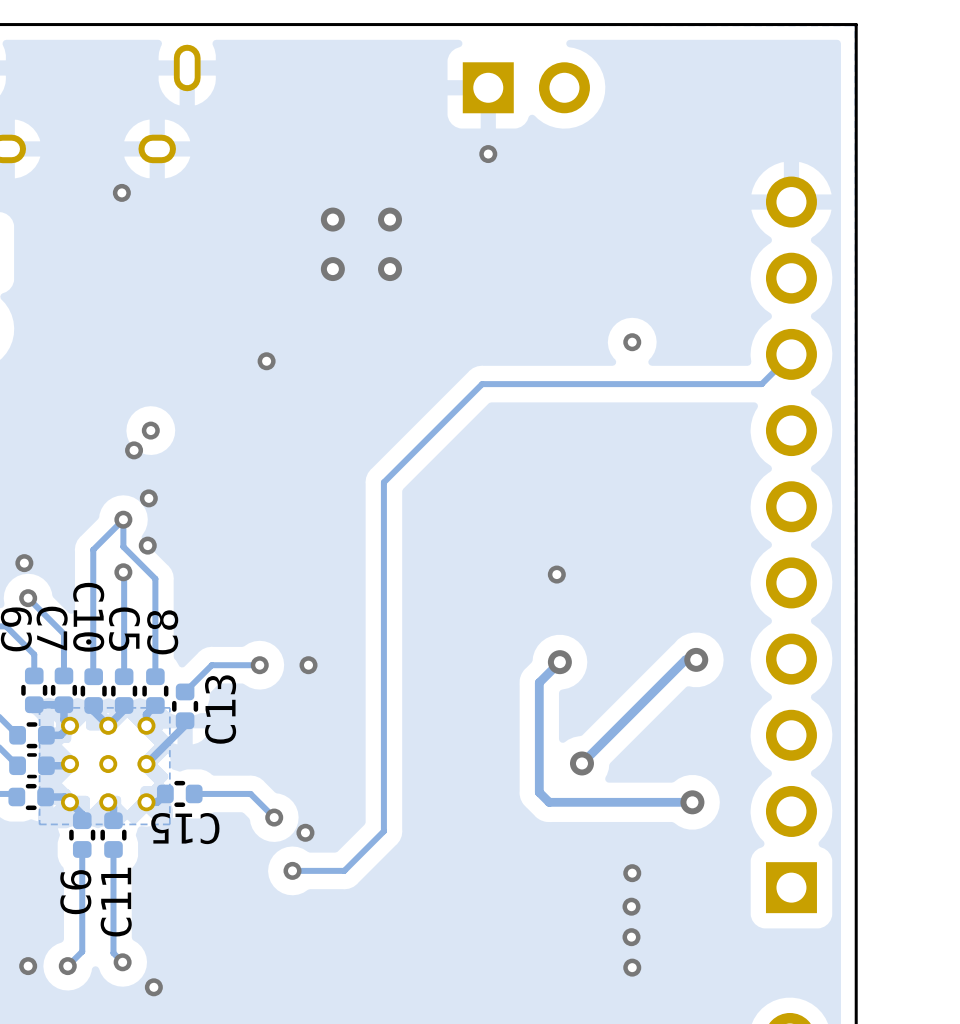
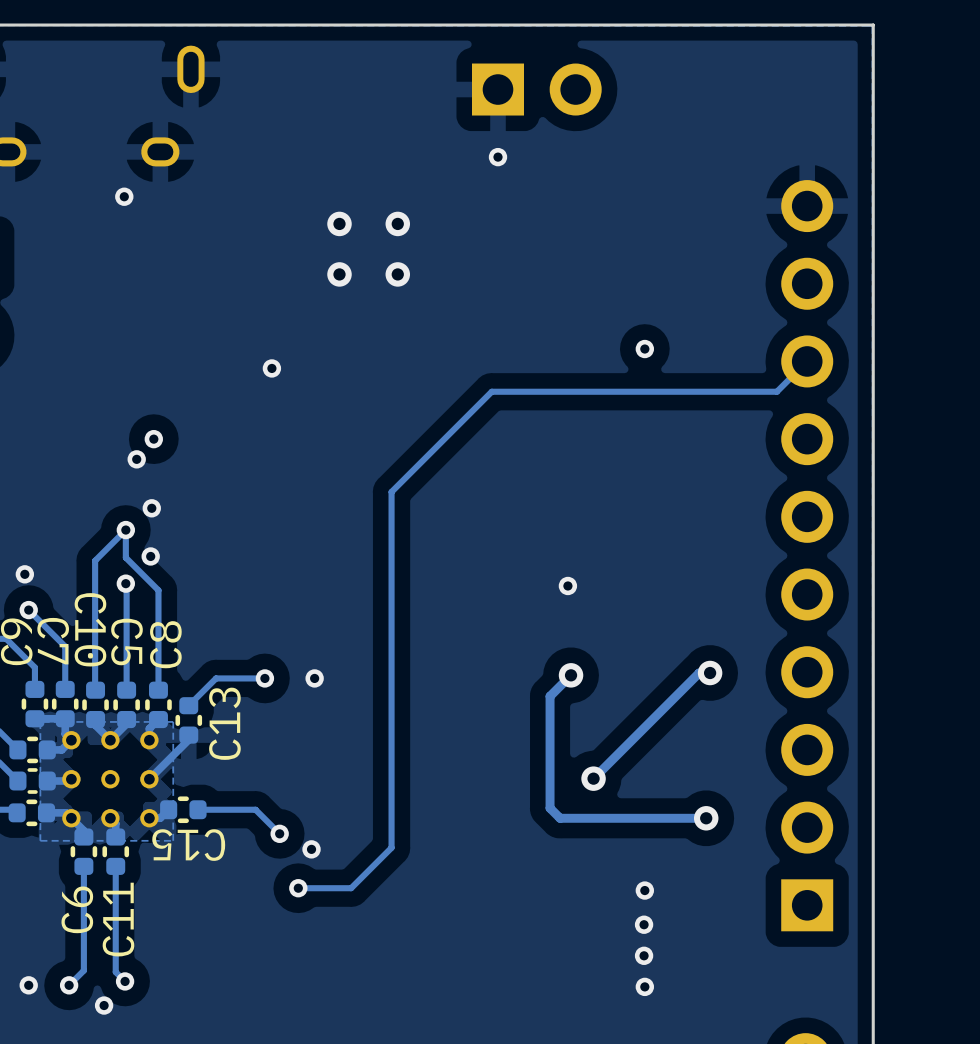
via position: (153, 987) -> (104, 1005)

